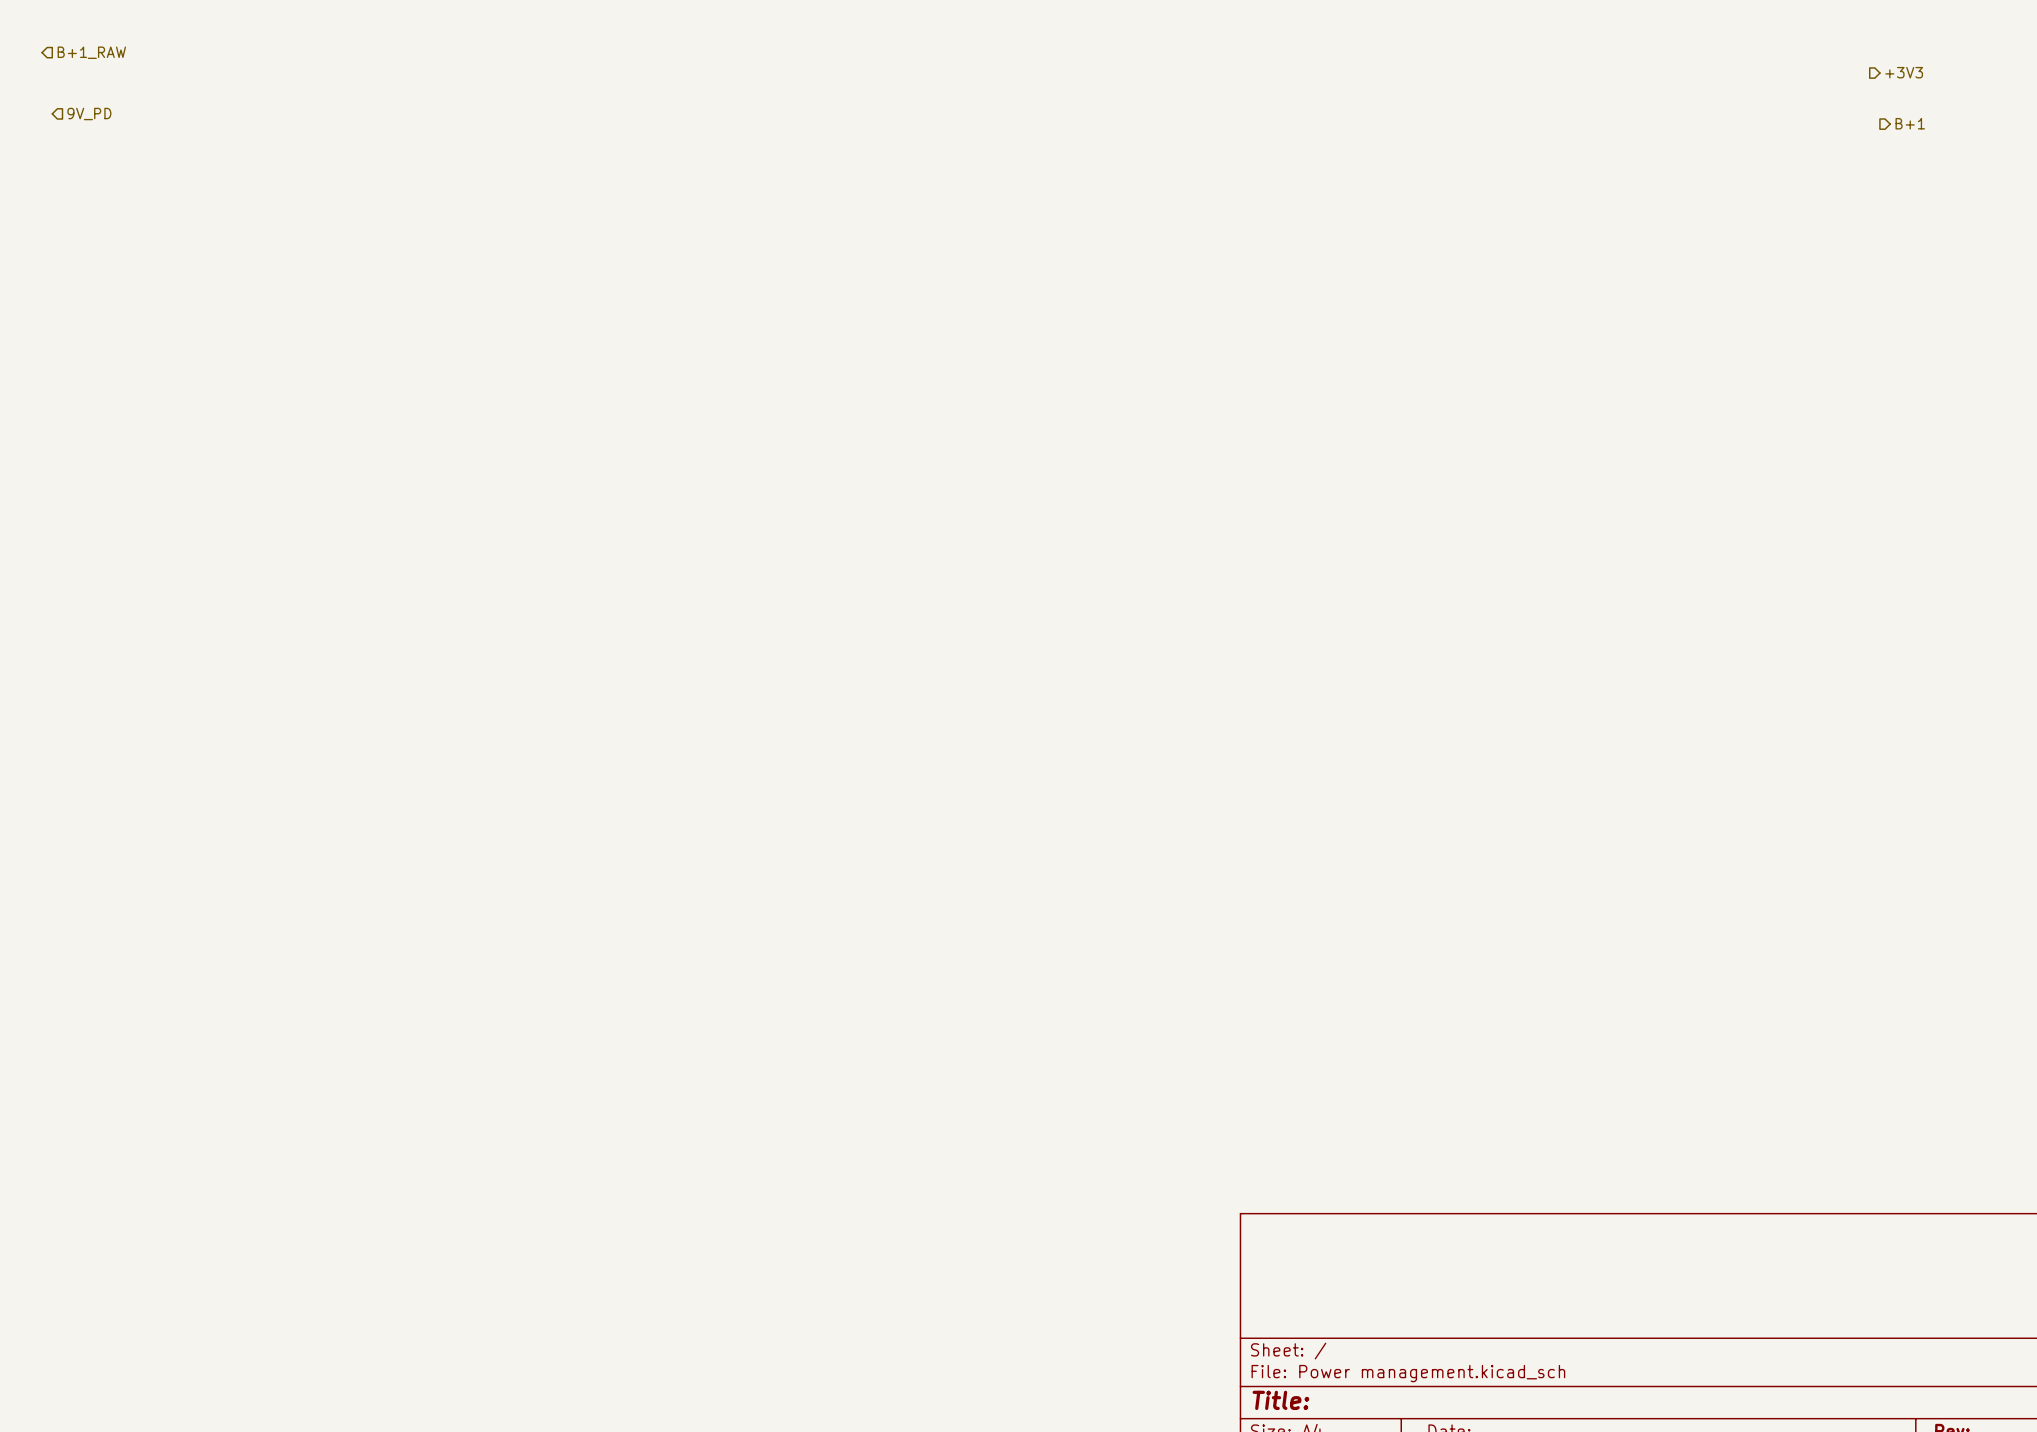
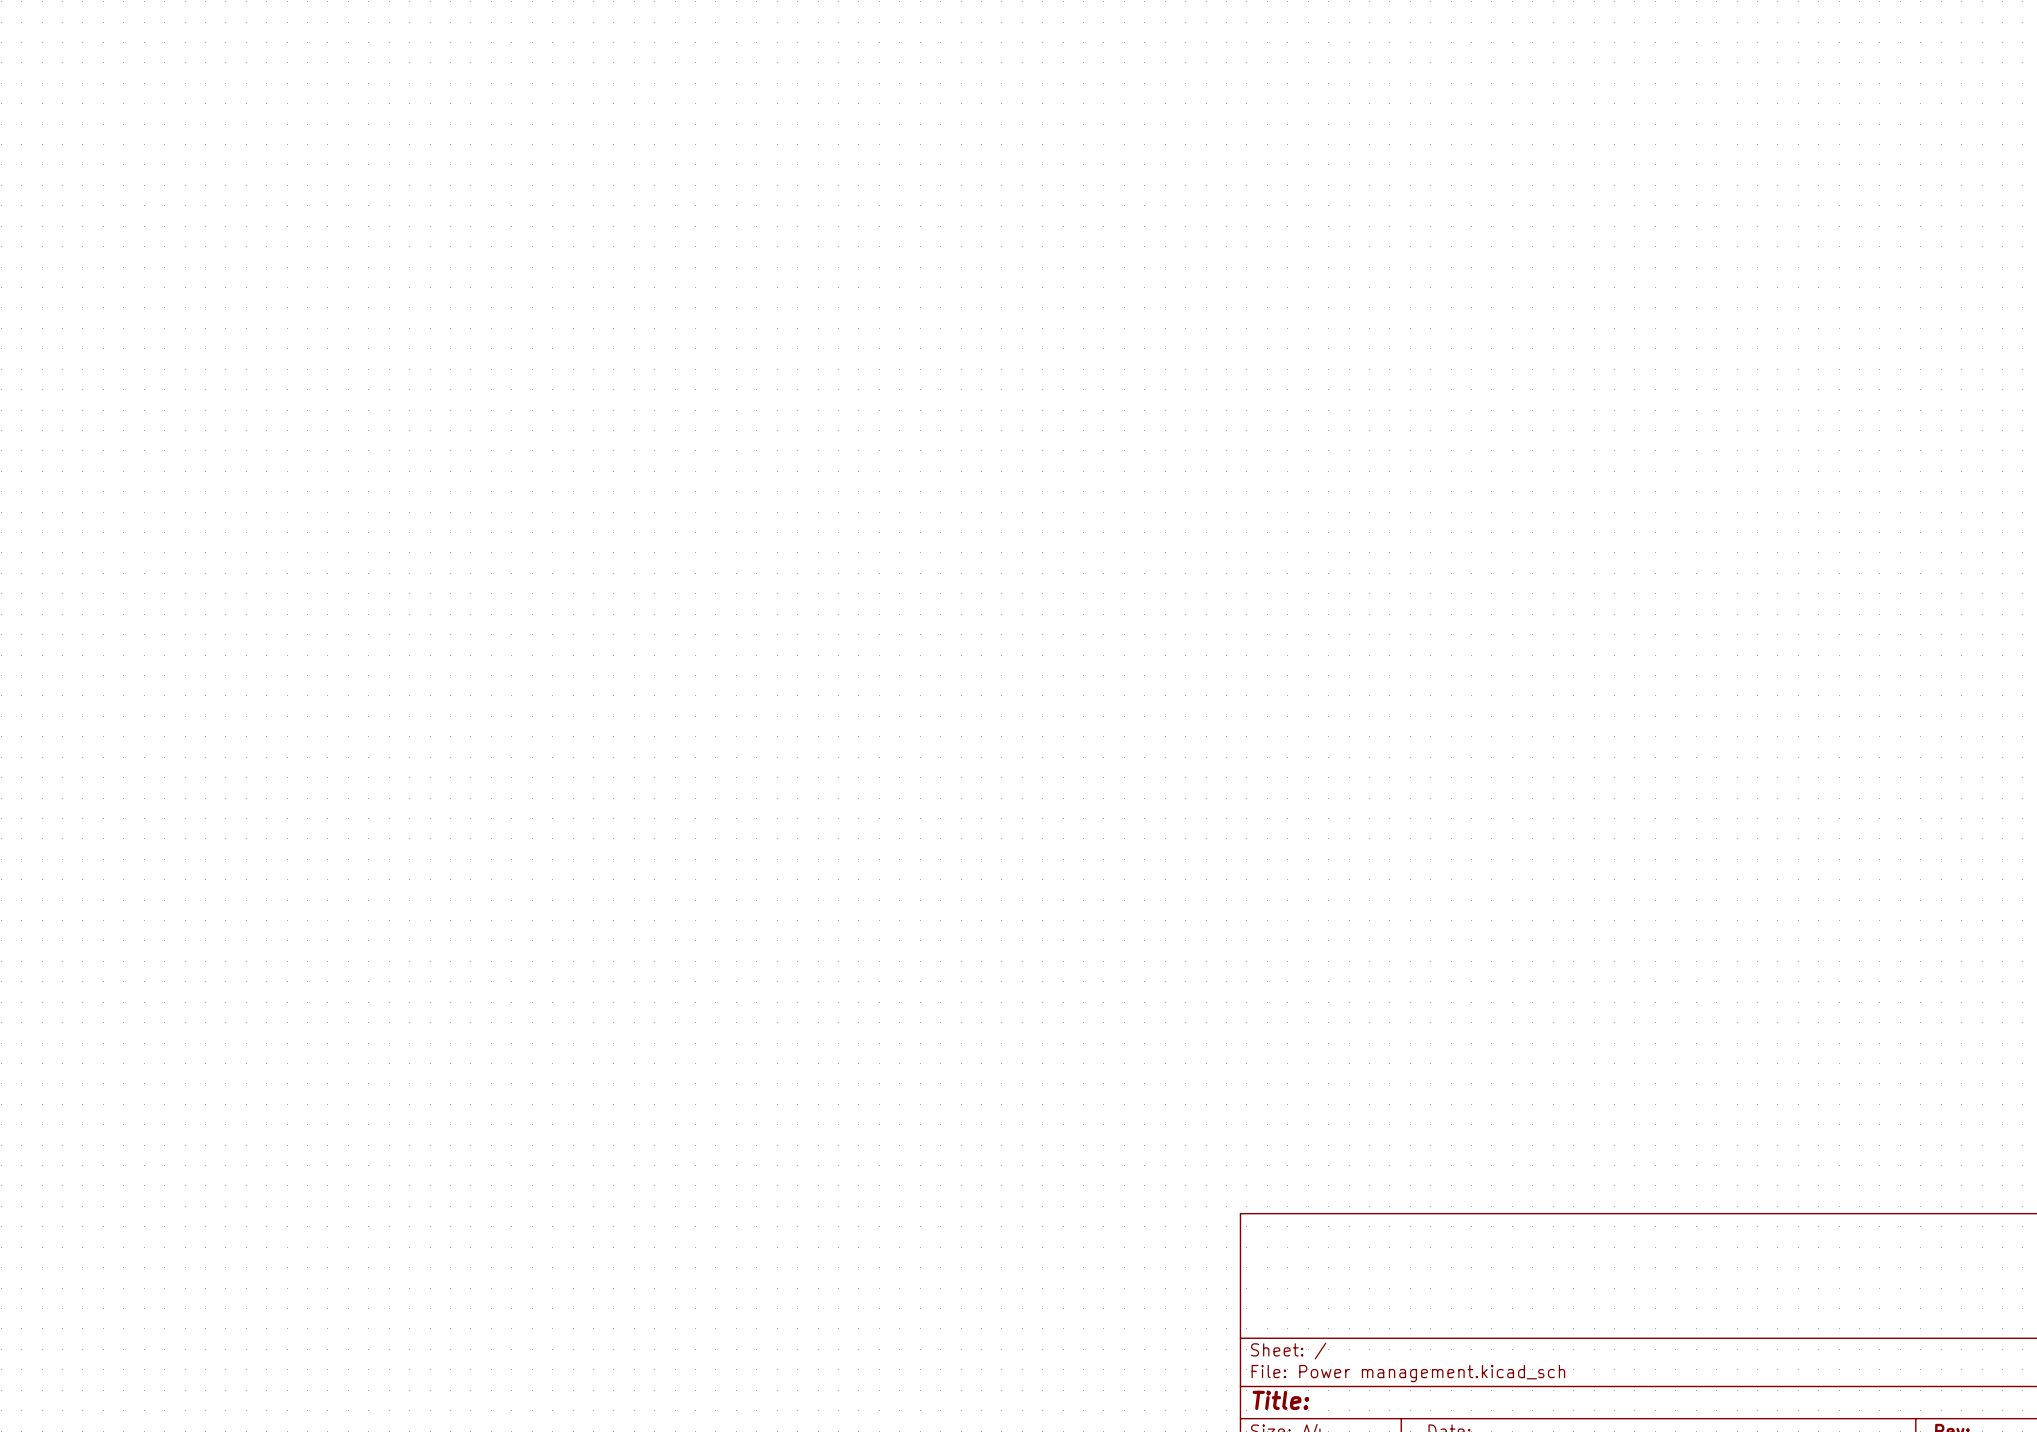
hierarchical label: B+1_RAW (91, 52) -> none
hierarchical label: +3V3 (1904, 72) -> none
hierarchical label: 9V_PD (89, 114) -> none
hierarchical label: B+1 (1910, 123) -> none

